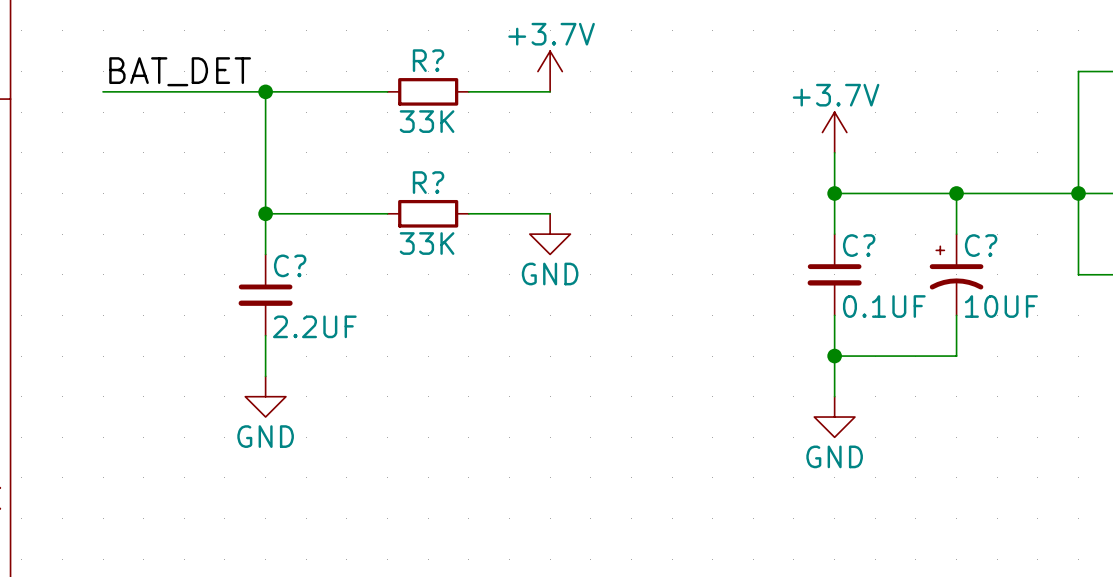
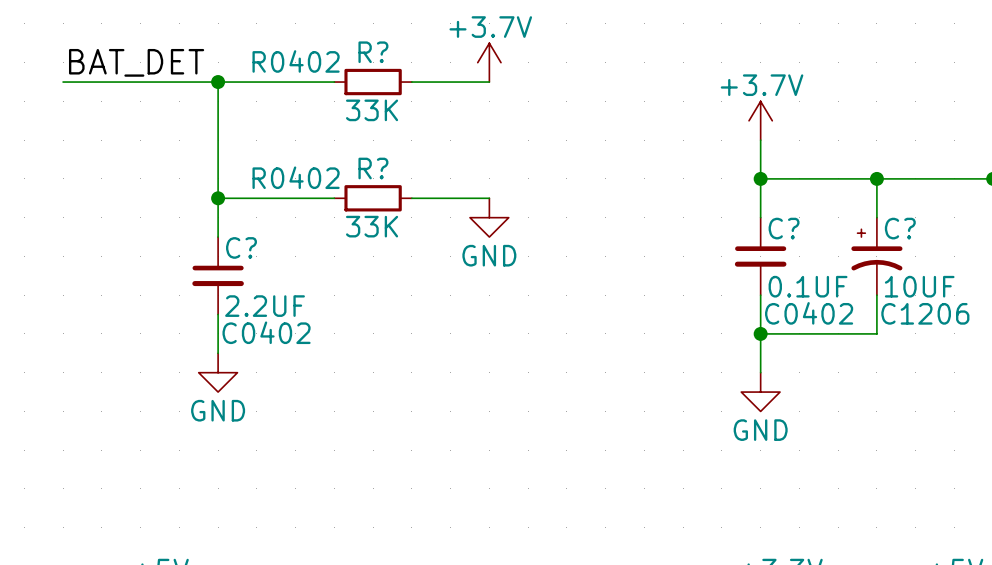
R? text: none -> R0402 (296, 61)
R? text: none -> R0402 (296, 177)
C? text: none -> C0402 (809, 313)
C? text: none -> C1206 (925, 313)
C? text: none -> C0402 (266, 332)

